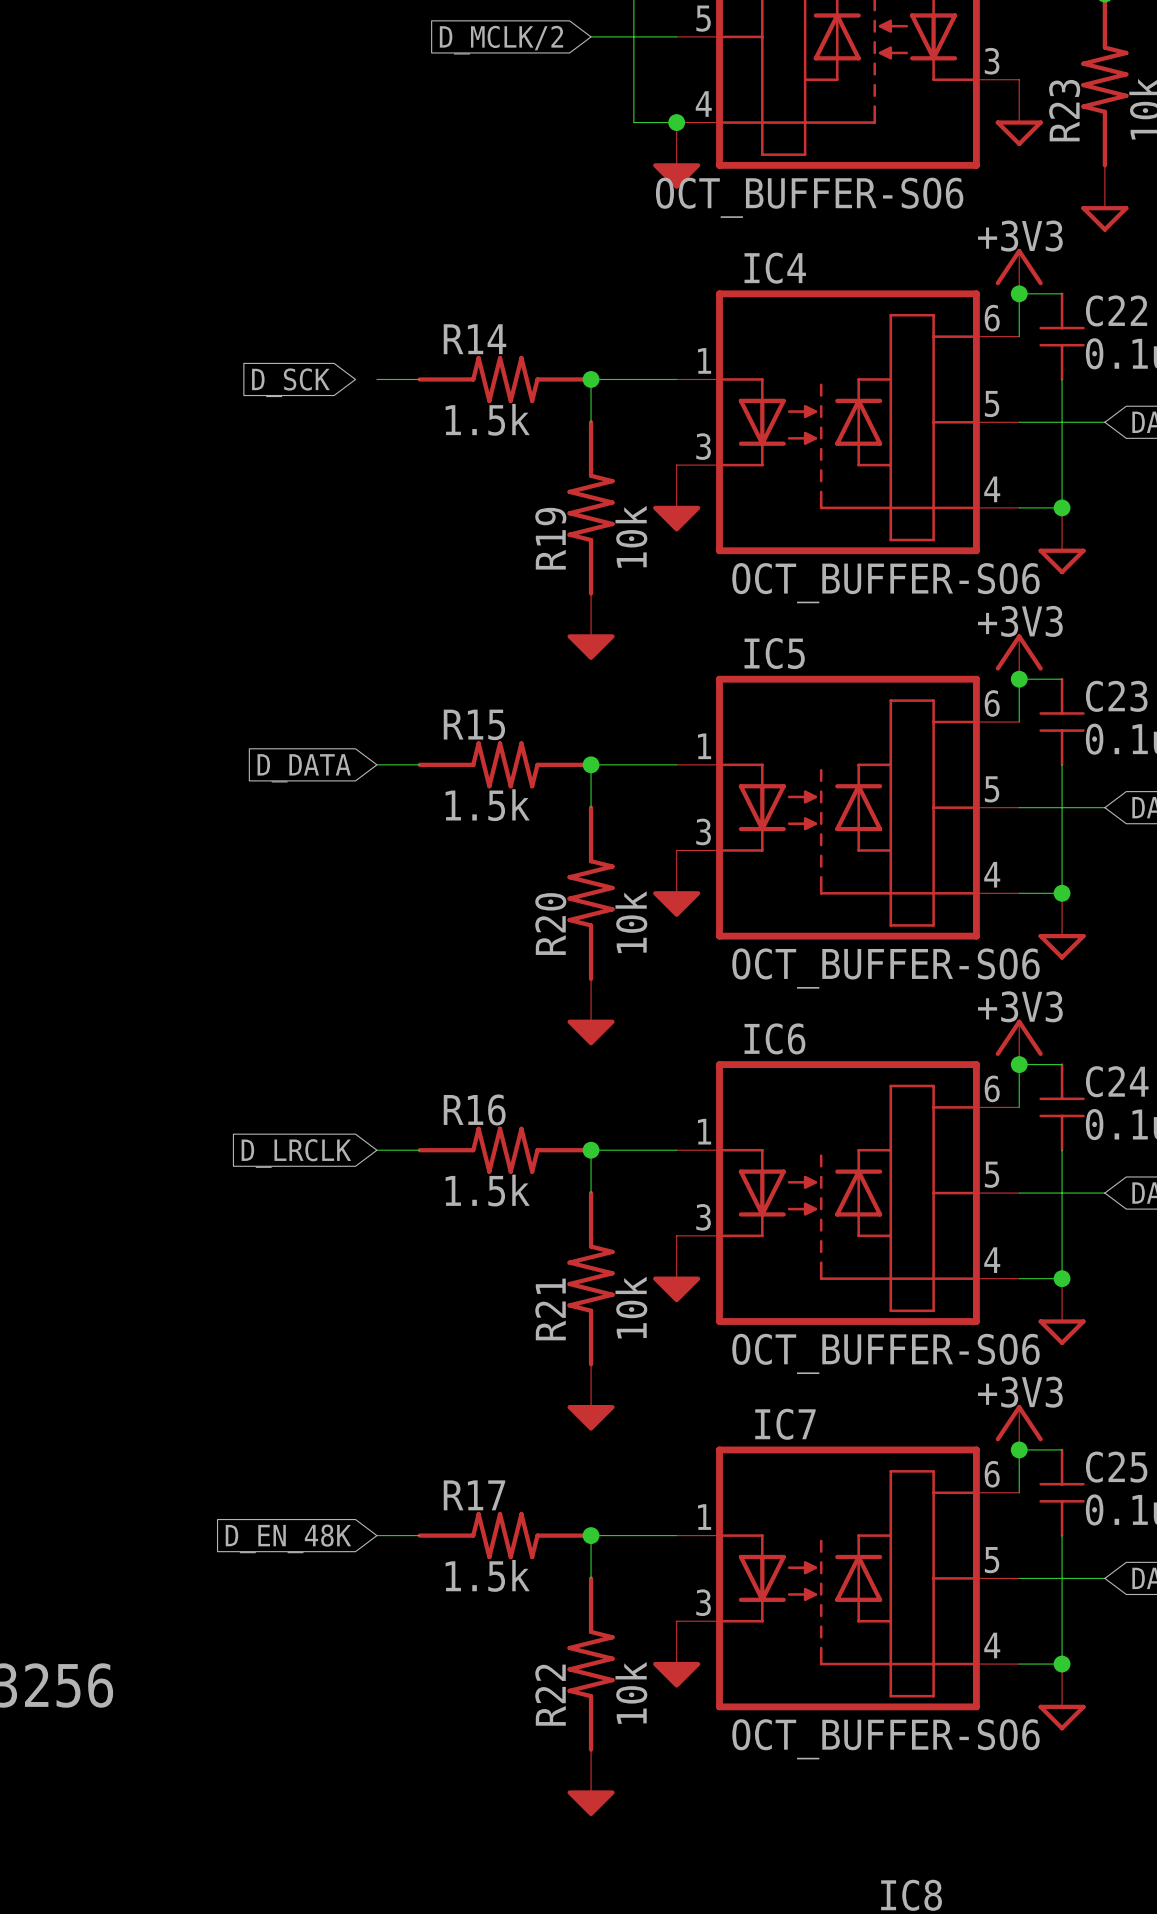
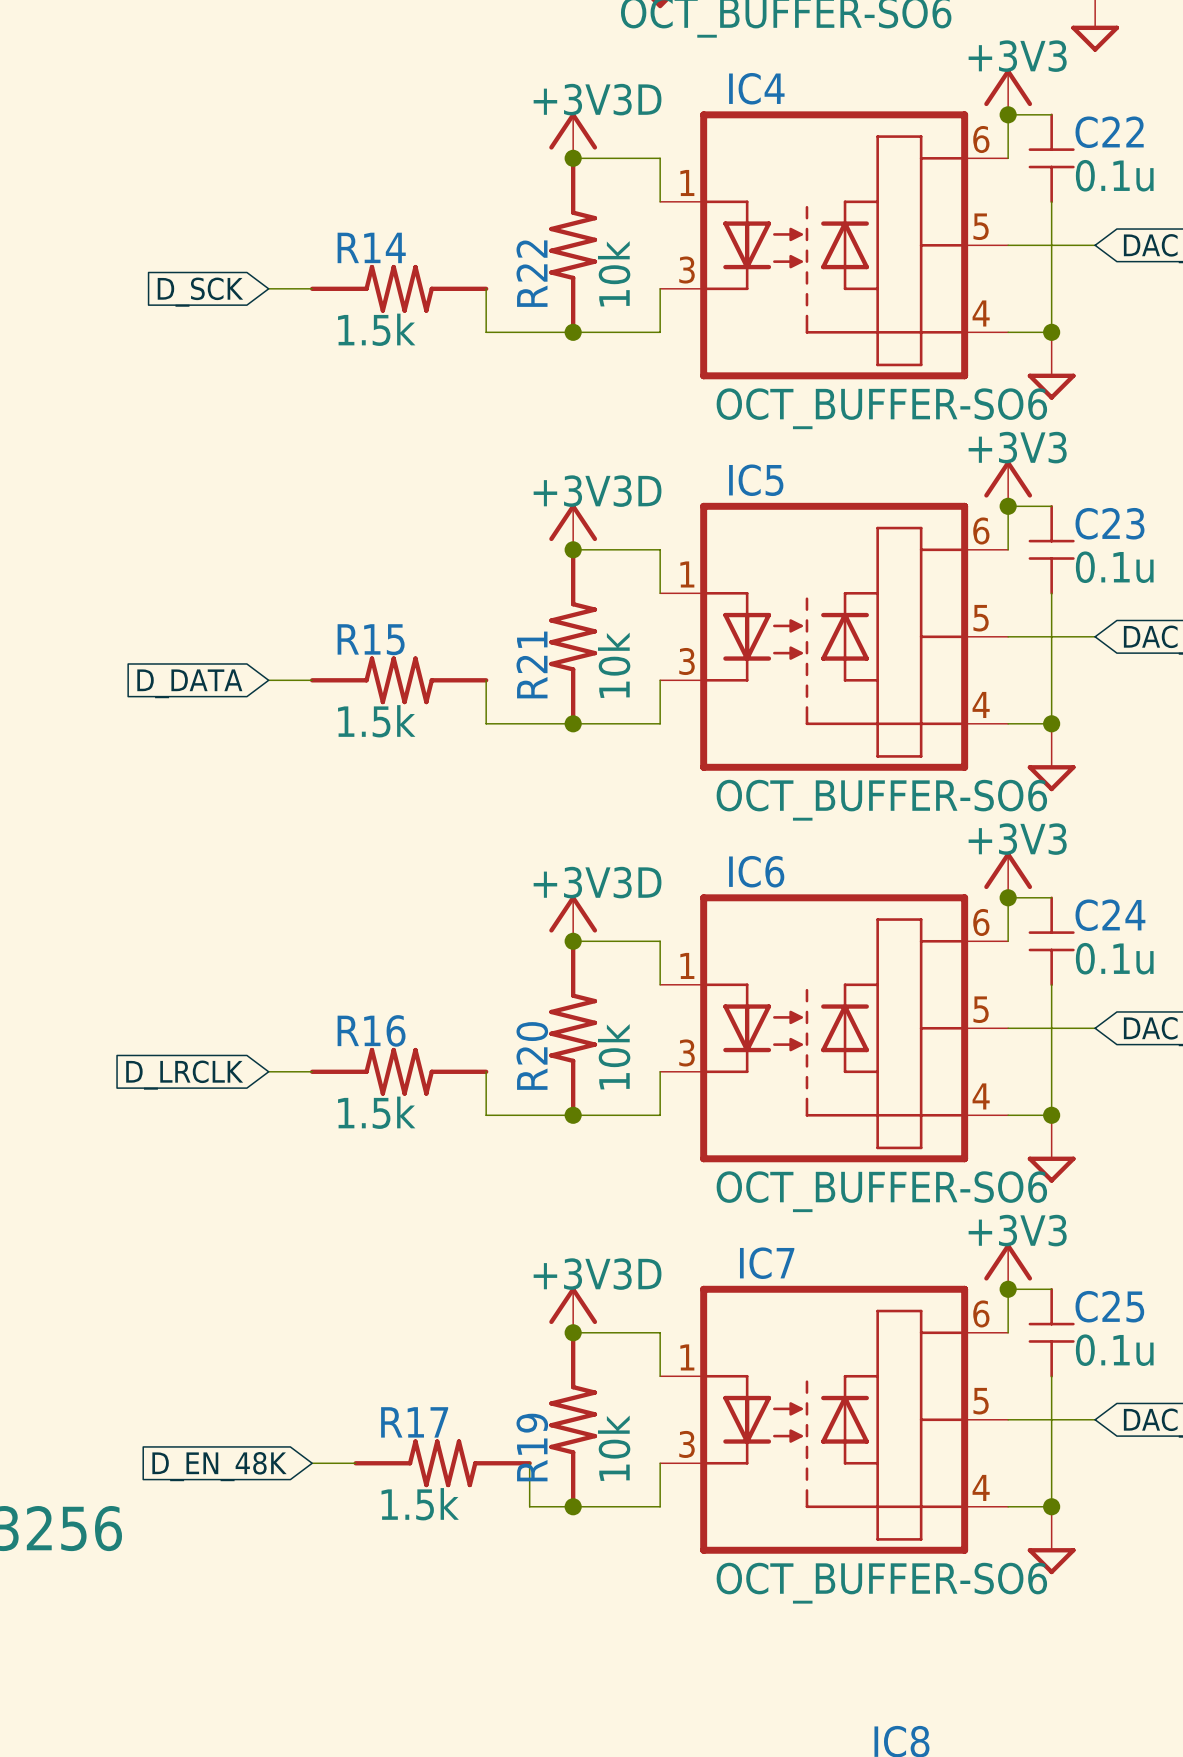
power symbol: none -> +3V3D (573, 135)
wire: (376, 379) (419, 379) -> (268, 288) (312, 288)
R14 position: (505, 379) -> (399, 288)
junction position: (591, 379) -> (573, 158)
wire: (676, 379) (591, 379) (591, 422) -> (660, 201) (660, 158) (573, 158)
global label position: D_SCK (290, 382) -> D_SCK (200, 292)
wire: none -> (486, 288) (486, 332) (660, 332) (660, 288)
power symbol: (676, 498) -> none
R19 position: (591, 507) -> (573, 1419)
junction: none -> (573, 332)
power symbol: (591, 626) -> none
power symbol: none -> +3V3D (573, 526)
wire: (376, 764) (419, 764) -> (268, 680) (312, 680)
R15 position: (505, 764) -> (399, 680)
junction position: (591, 764) -> (573, 549)
wire: (676, 764) (591, 764) (591, 807) -> (660, 593) (660, 549) (573, 549)
global label position: D_DATA (304, 768) -> D_DATA (189, 683)
wire: none -> (486, 680) (486, 723) (660, 723) (660, 680)
power symbol: (676, 883) -> none
R20 position: (591, 893) -> (573, 1028)
junction: none -> (573, 723)
power symbol: (591, 1012) -> none
power symbol: none -> +3V3D (573, 918)
wire: (376, 1150) (419, 1150) -> (268, 1071) (312, 1071)
R16 position: (505, 1150) -> (399, 1071)
junction position: (591, 1150) -> (573, 941)
wire: (676, 1150) (591, 1150) (591, 1193) -> (660, 984) (660, 941) (573, 941)
global label position: D_LRCLK (296, 1153) -> D_LRCLK (184, 1075)
wire: none -> (486, 1071) (486, 1115) (660, 1115) (660, 1071)
power symbol: (676, 1269) -> none
R21 position: (591, 1278) -> (573, 636)
junction: none -> (573, 1115)
power symbol: (591, 1397) -> none
power symbol: none -> +3V3D (573, 1309)
wire: (376, 1535) (419, 1535) -> (312, 1463) (355, 1463)
R17 position: (505, 1535) -> (442, 1463)
junction position: (591, 1535) -> (573, 1332)
wire: (676, 1535) (591, 1535) (591, 1578) -> (660, 1376) (660, 1332) (573, 1332)
global label position: D_EN_48K (288, 1538) -> D_EN_48K (219, 1466)
wire: none -> (529, 1463) (529, 1506) (660, 1506) (660, 1463)
power symbol: (676, 1654) -> none
R22 position: (591, 1664) -> (573, 245)
junction: none -> (573, 1506)
power symbol: (591, 1782) -> none

